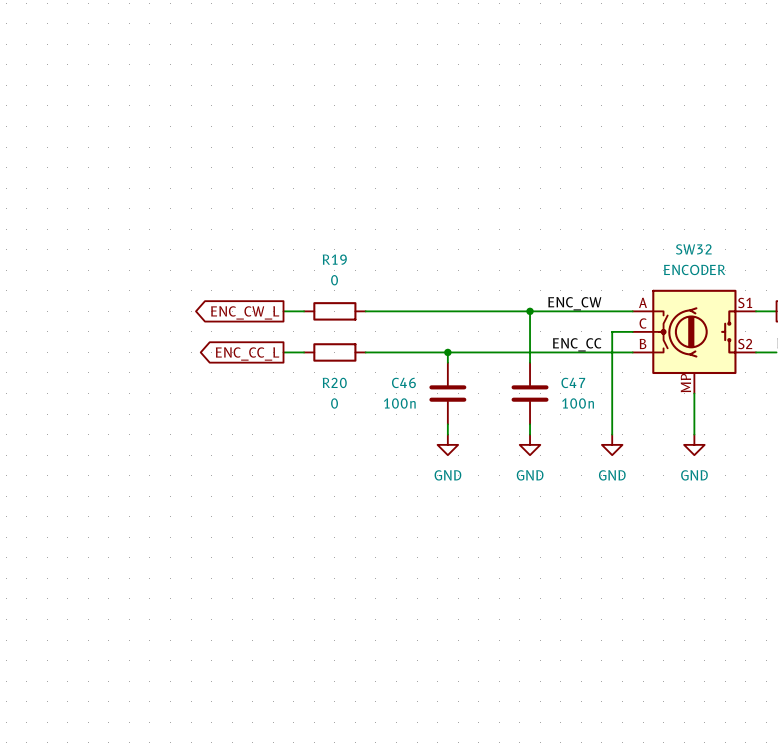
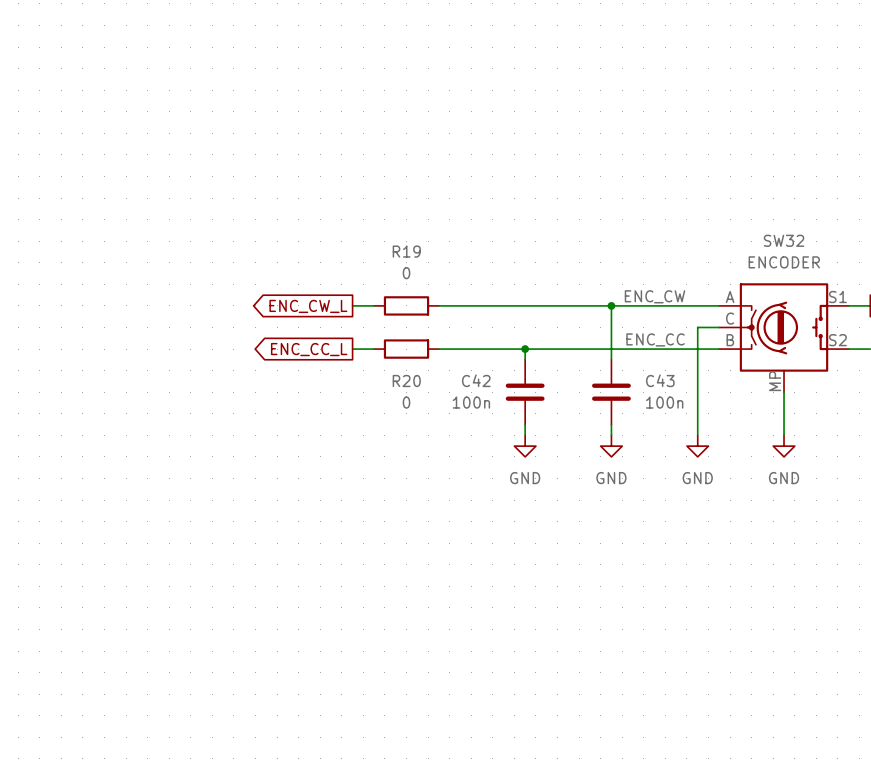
C46 name: C46 (403, 382) -> C42 (476, 380)
C47 name: C47 (573, 382) -> C43 (660, 380)

